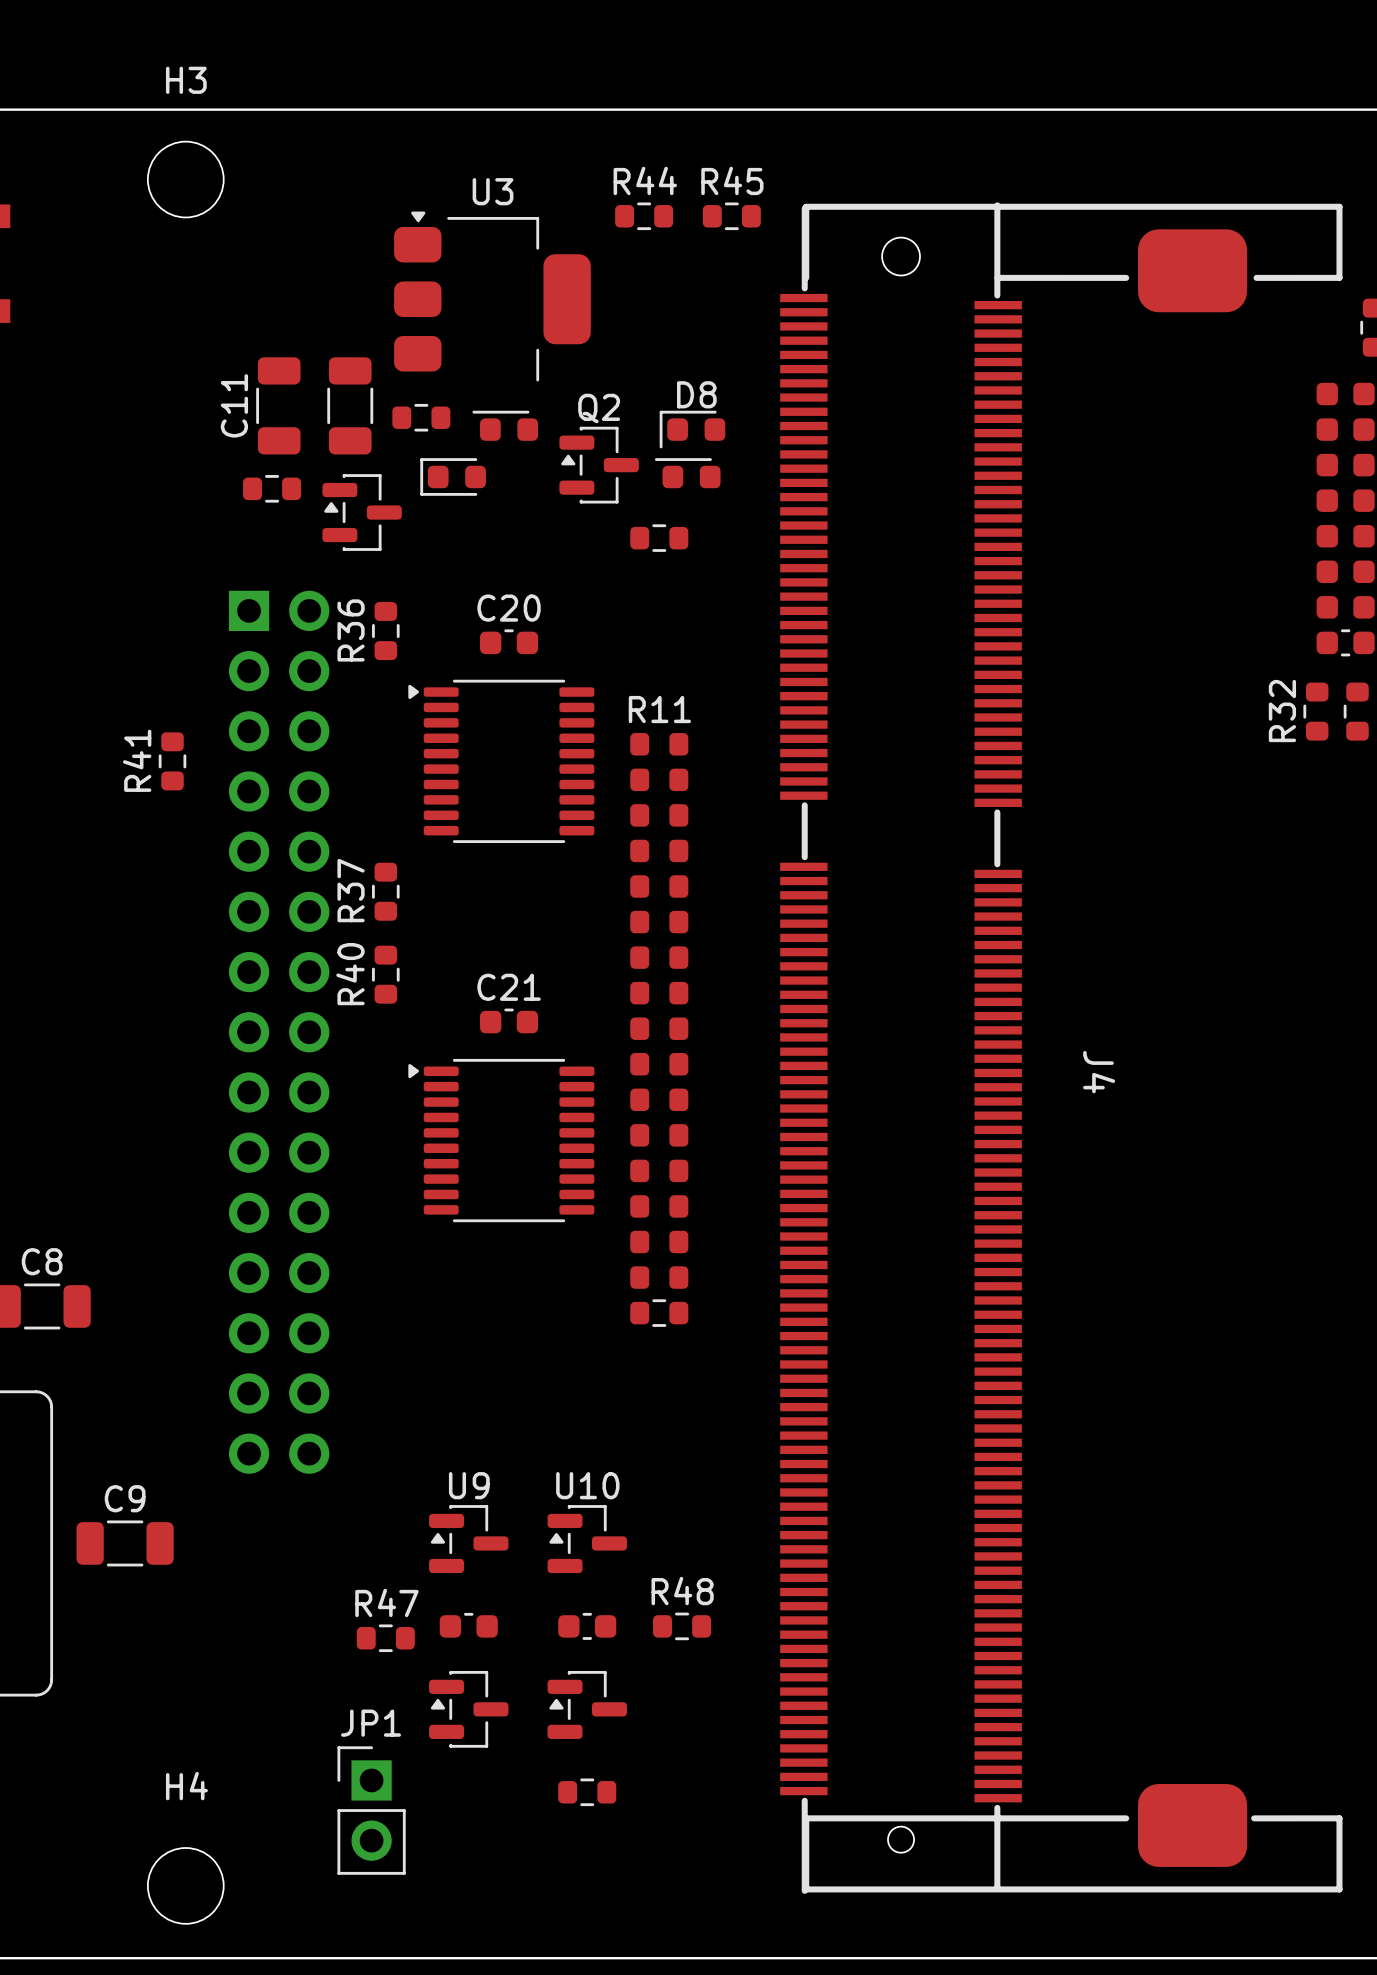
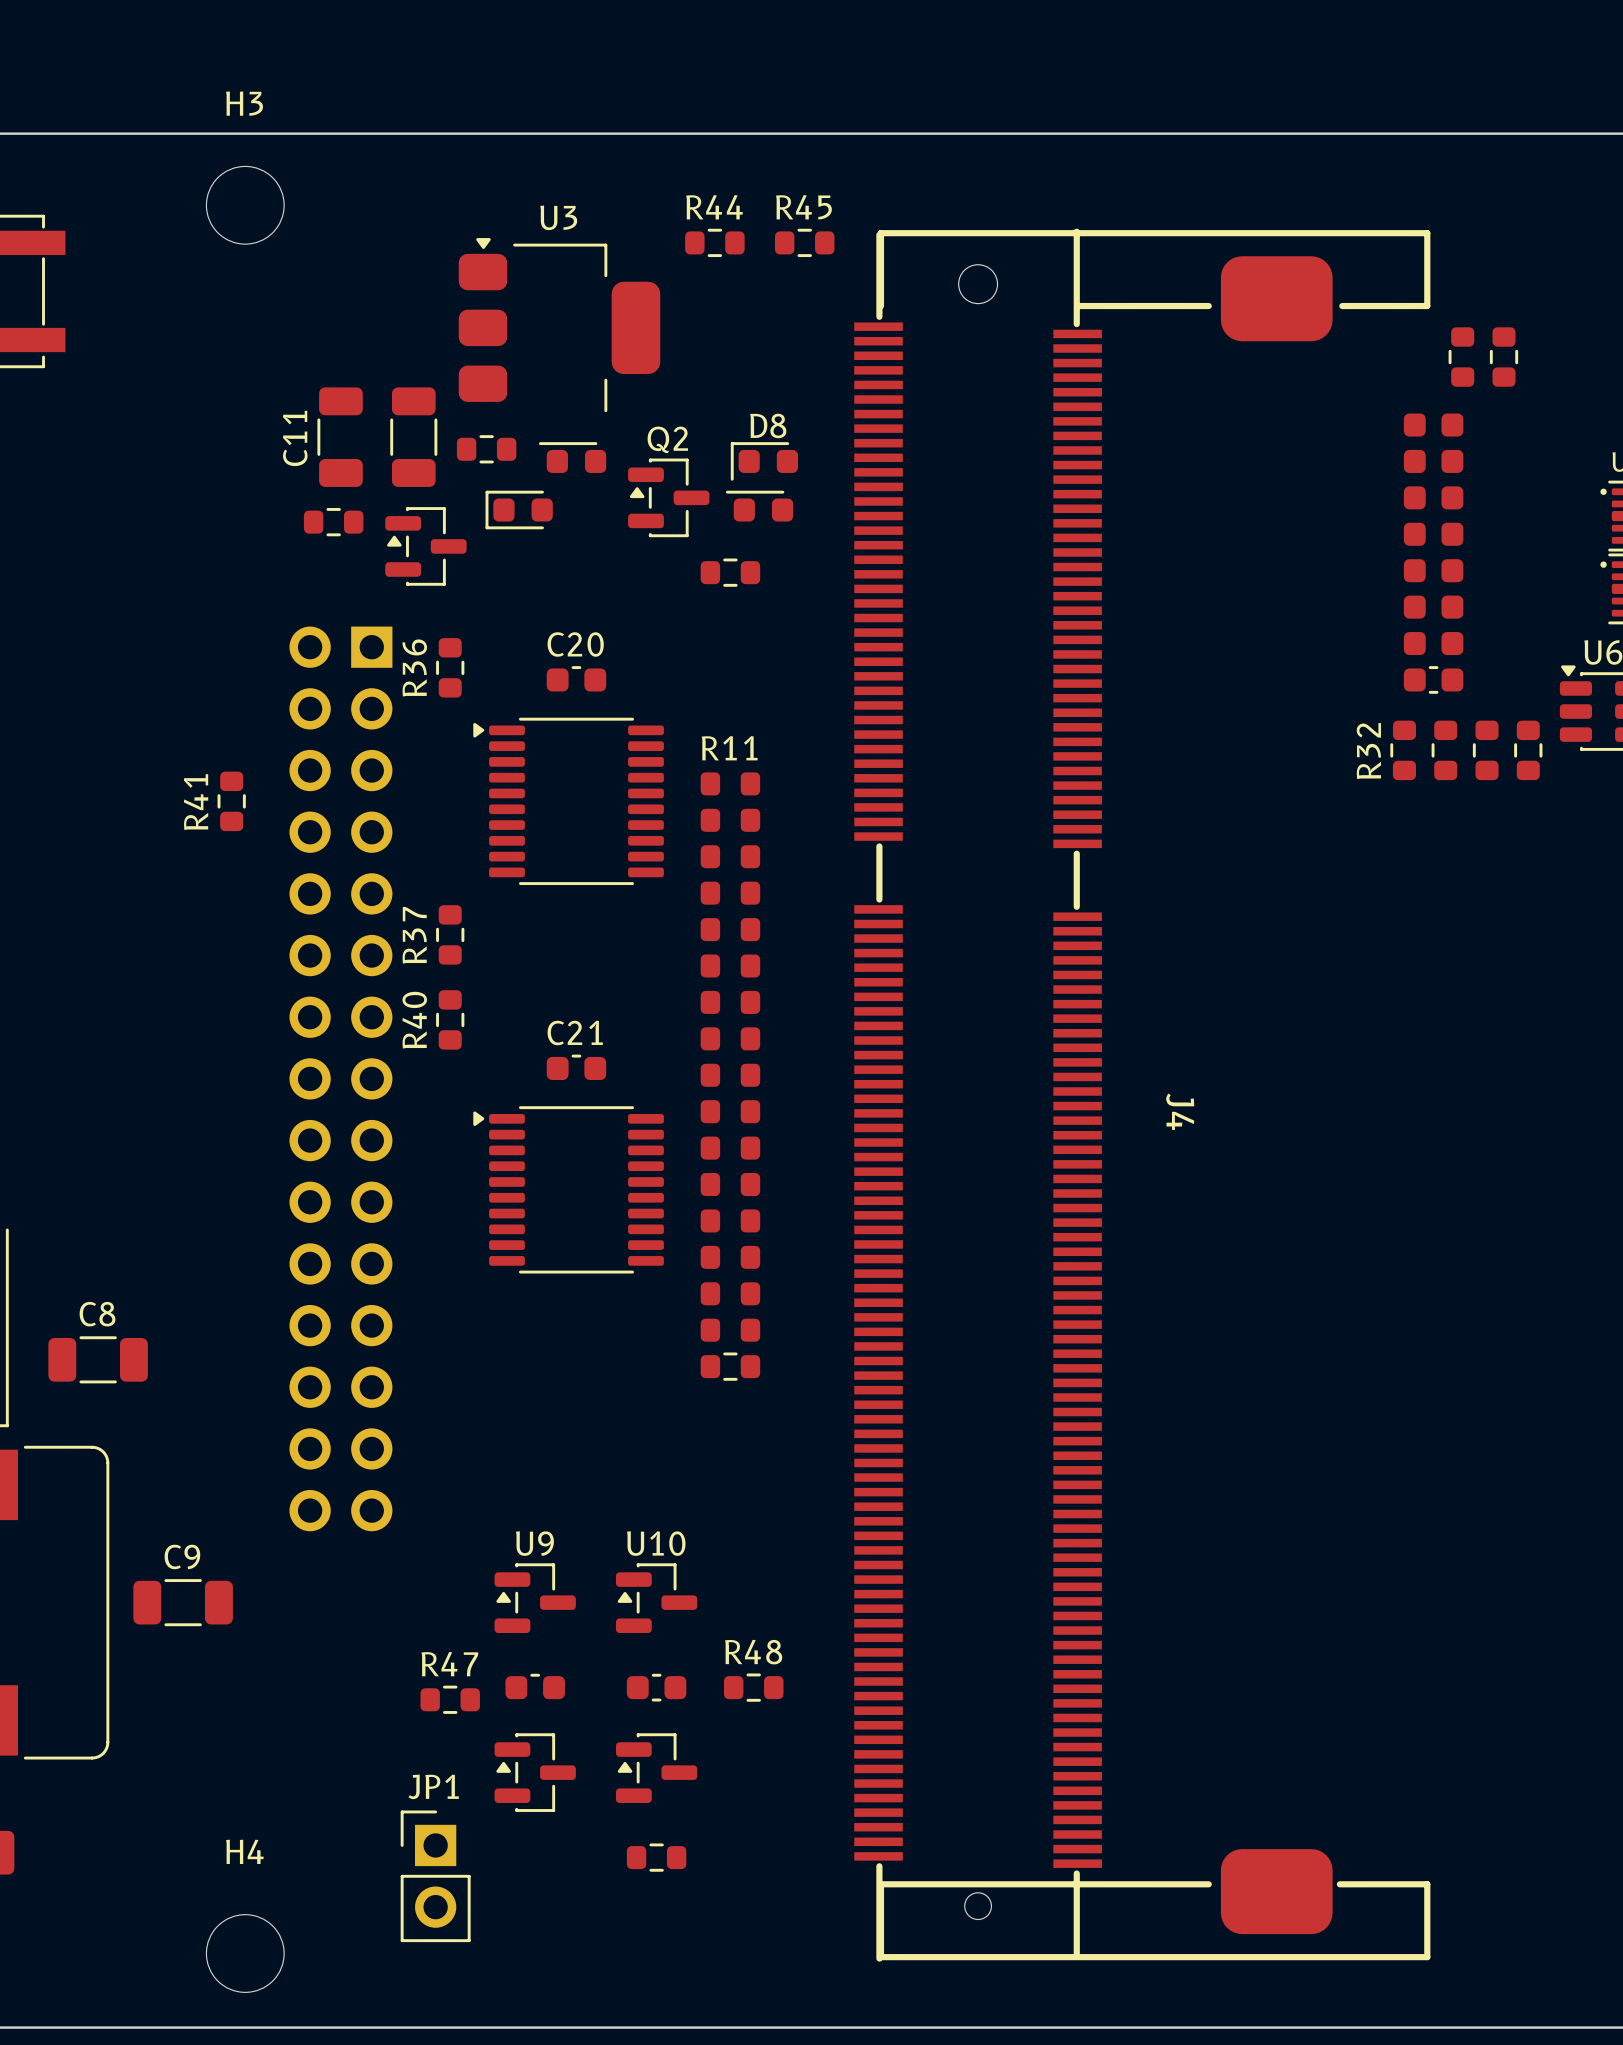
part footprint: [228, 590, 330, 1474] -> [289, 626, 393, 1532]

